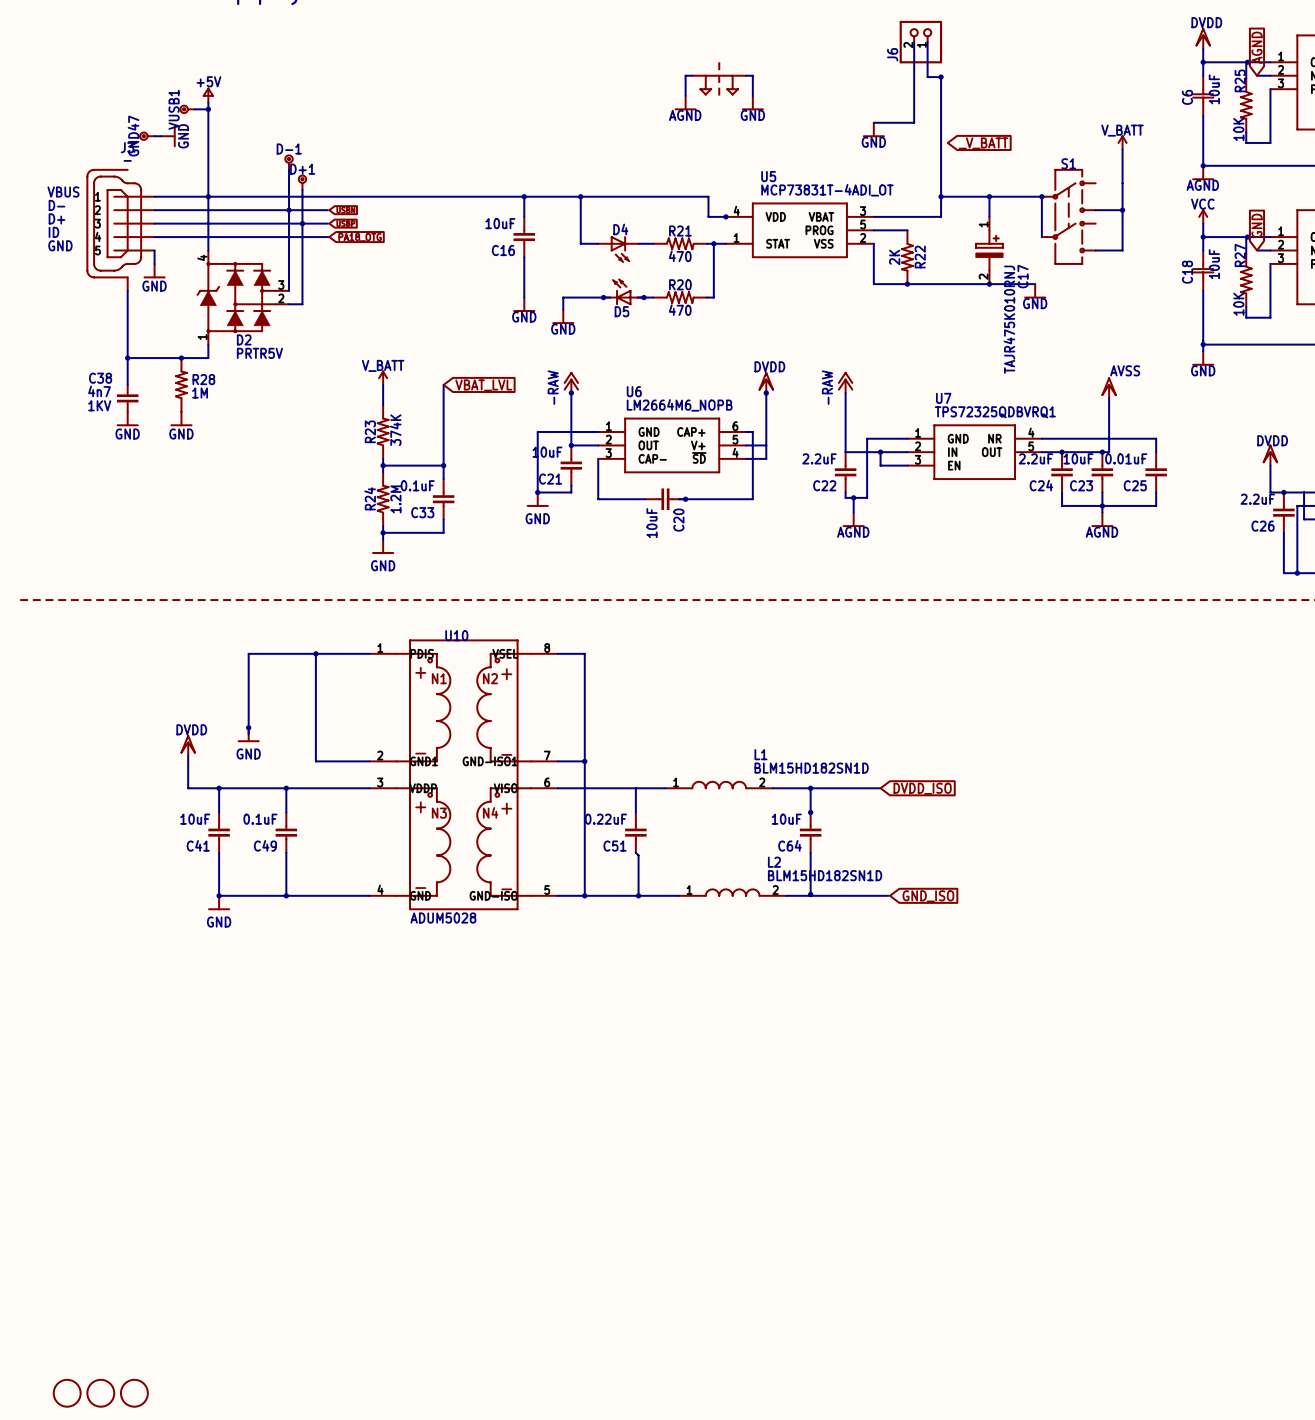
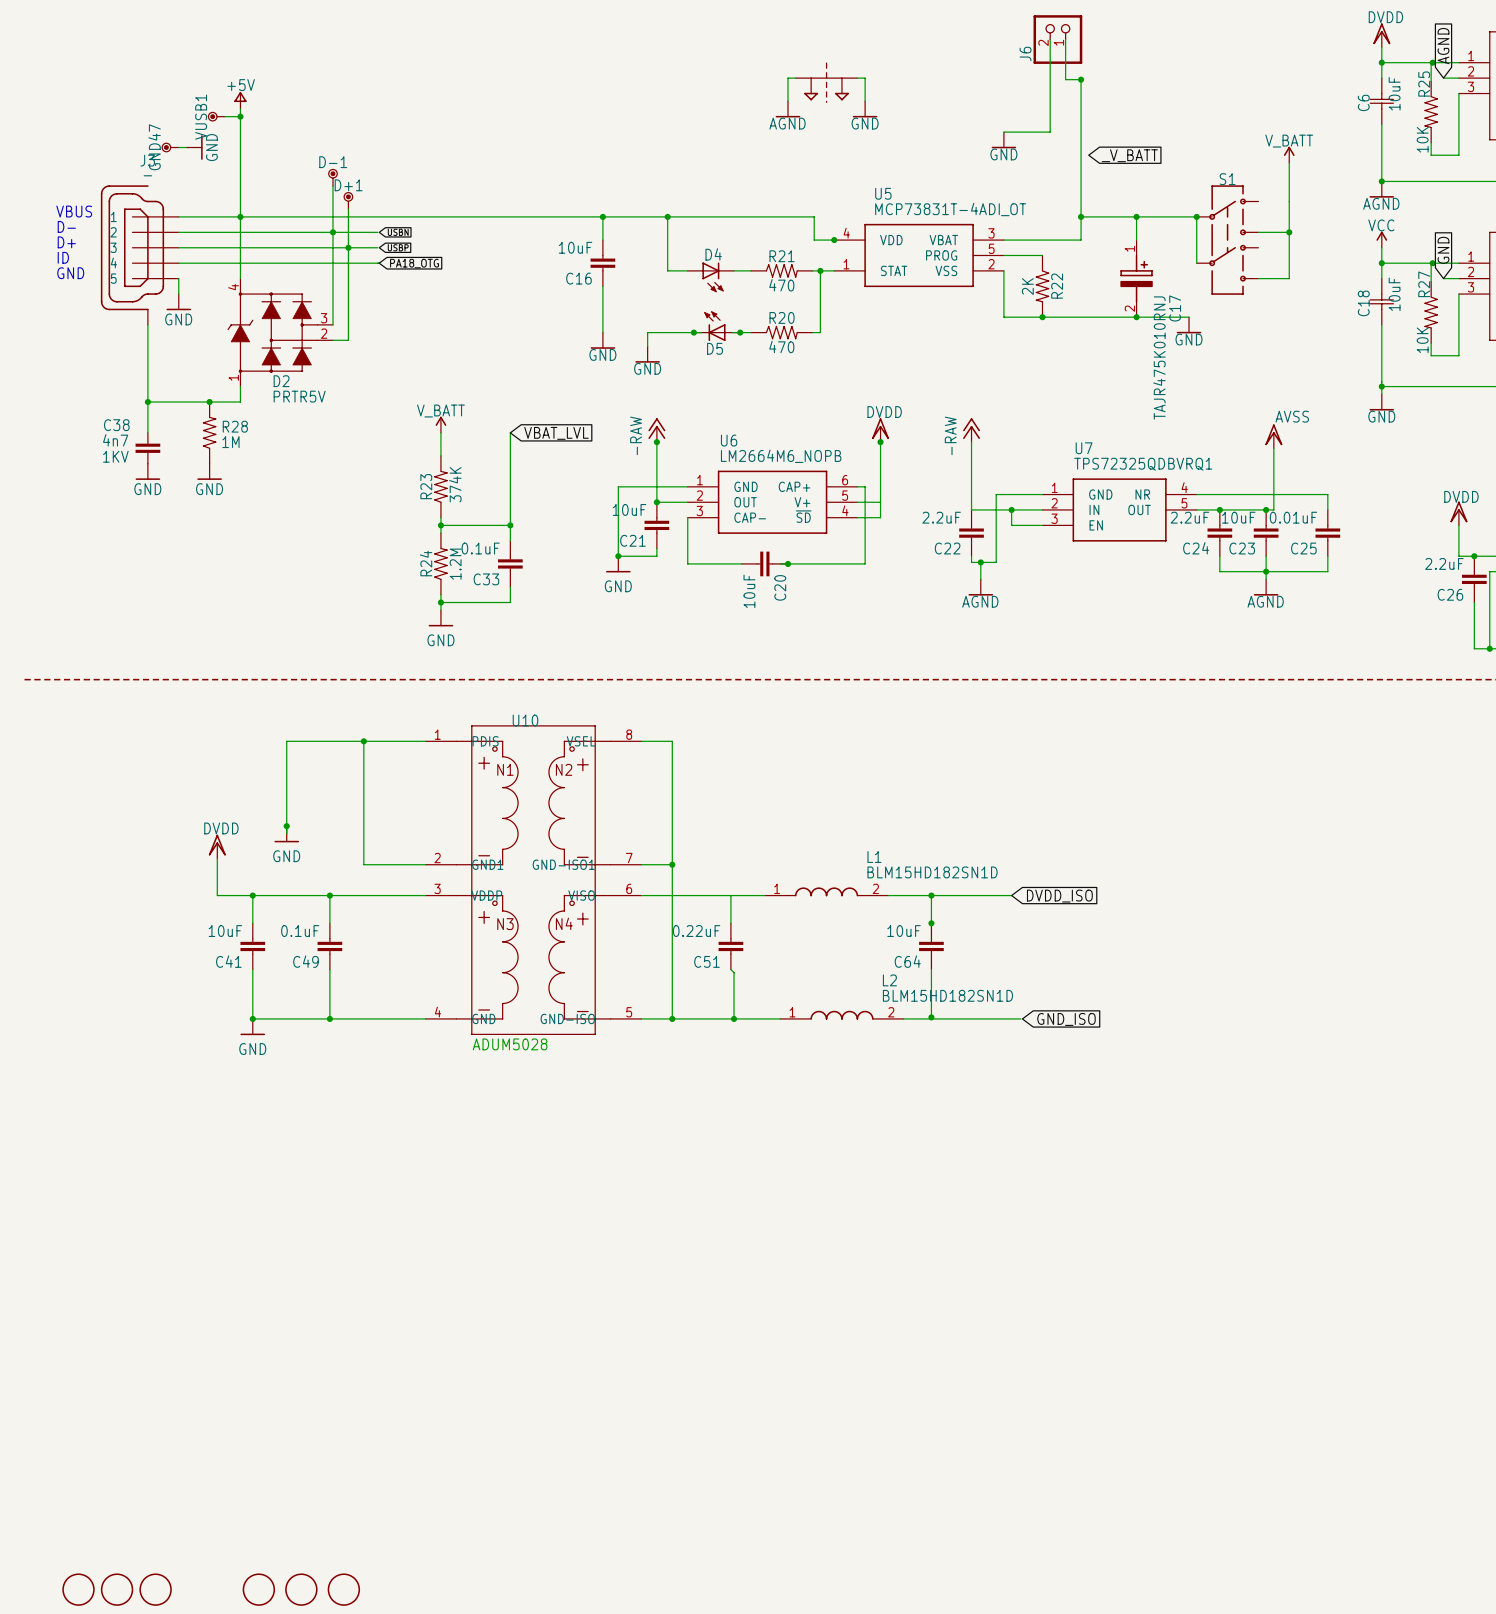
part: none -> (258, 1589)
part: none -> (301, 1589)
part: none -> (343, 1589)

